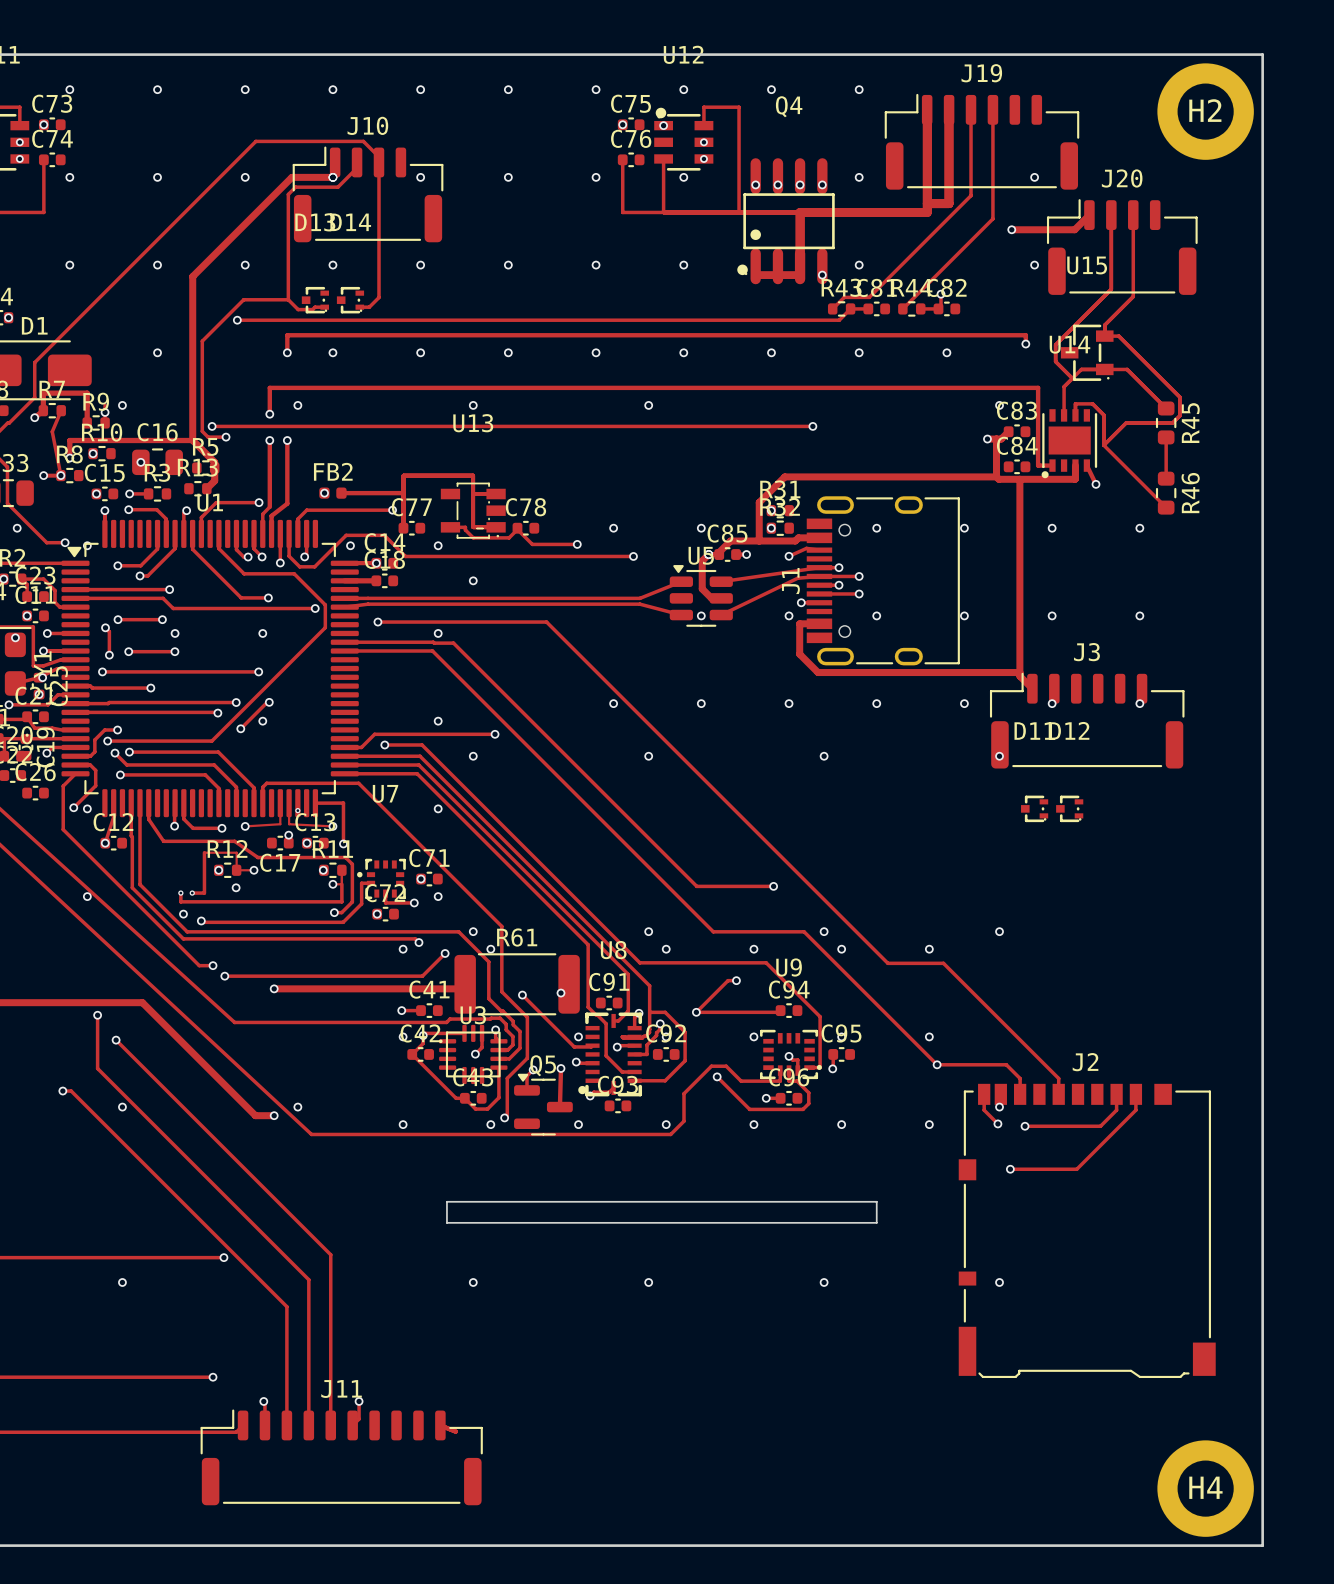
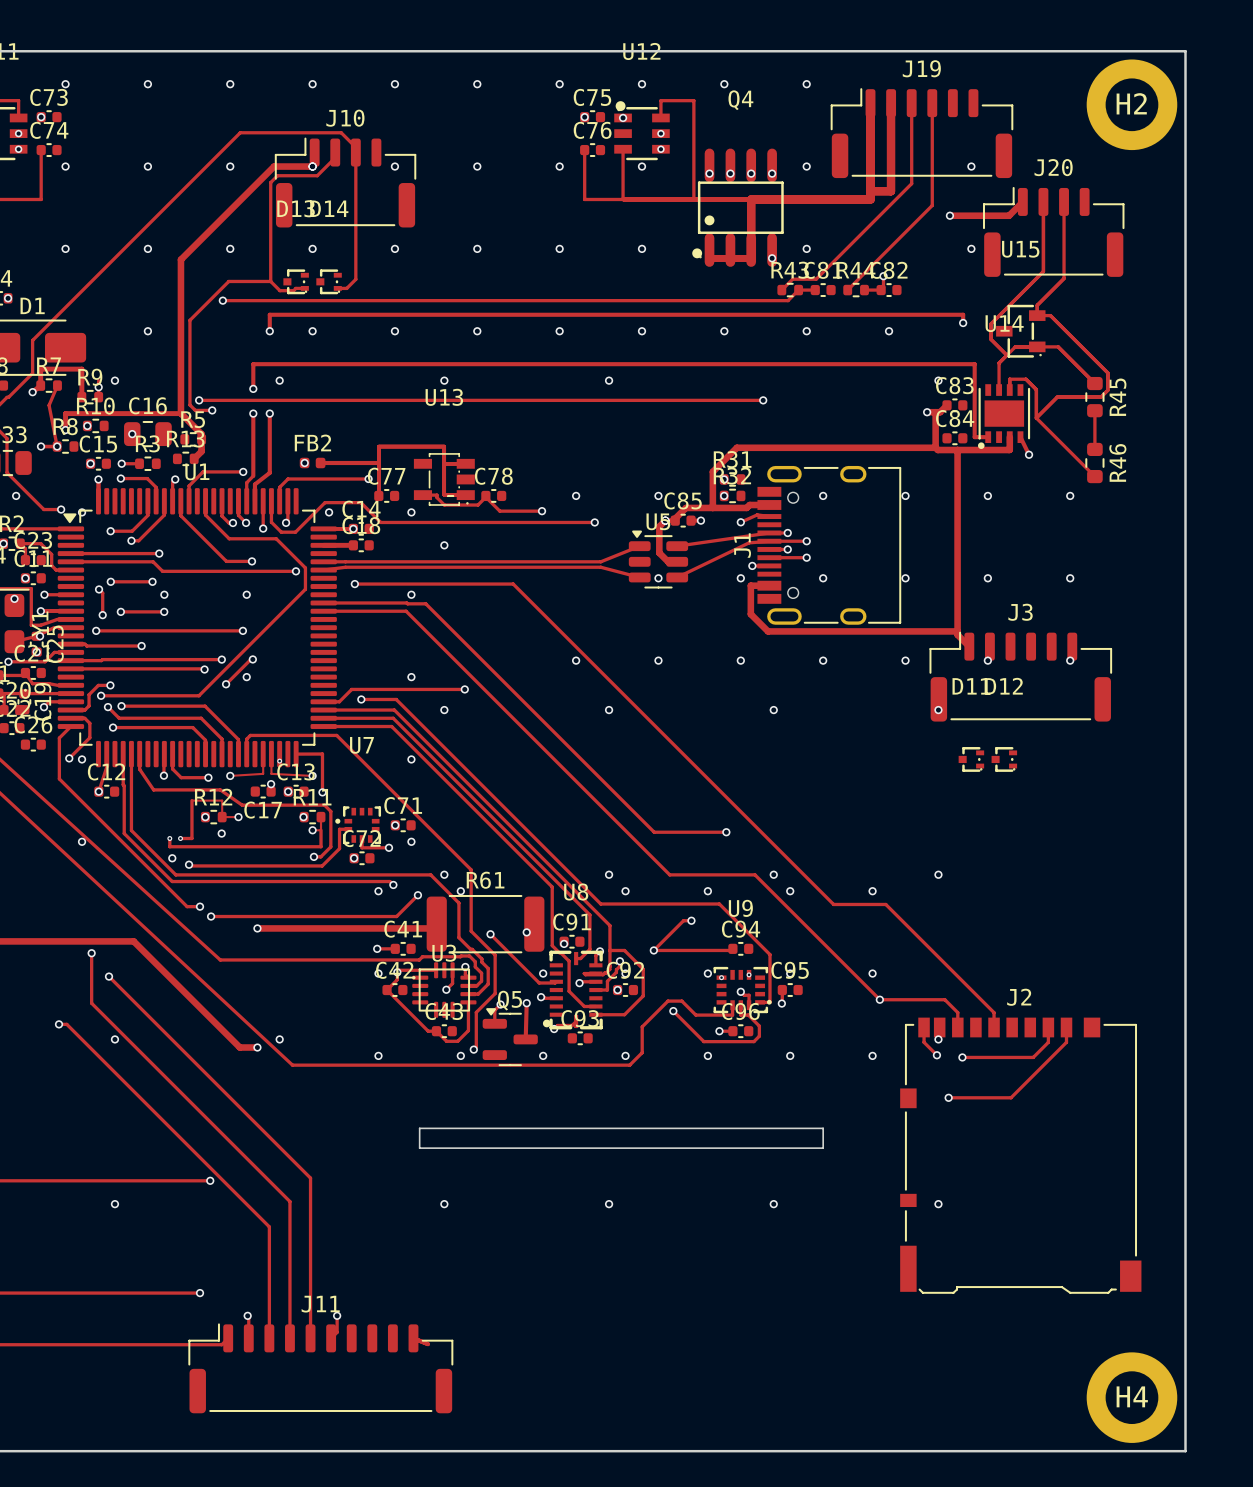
via: none -> (564, 943)
via: none -> (749, 974)
via: none -> (721, 977)
via: none -> (617, 990)

